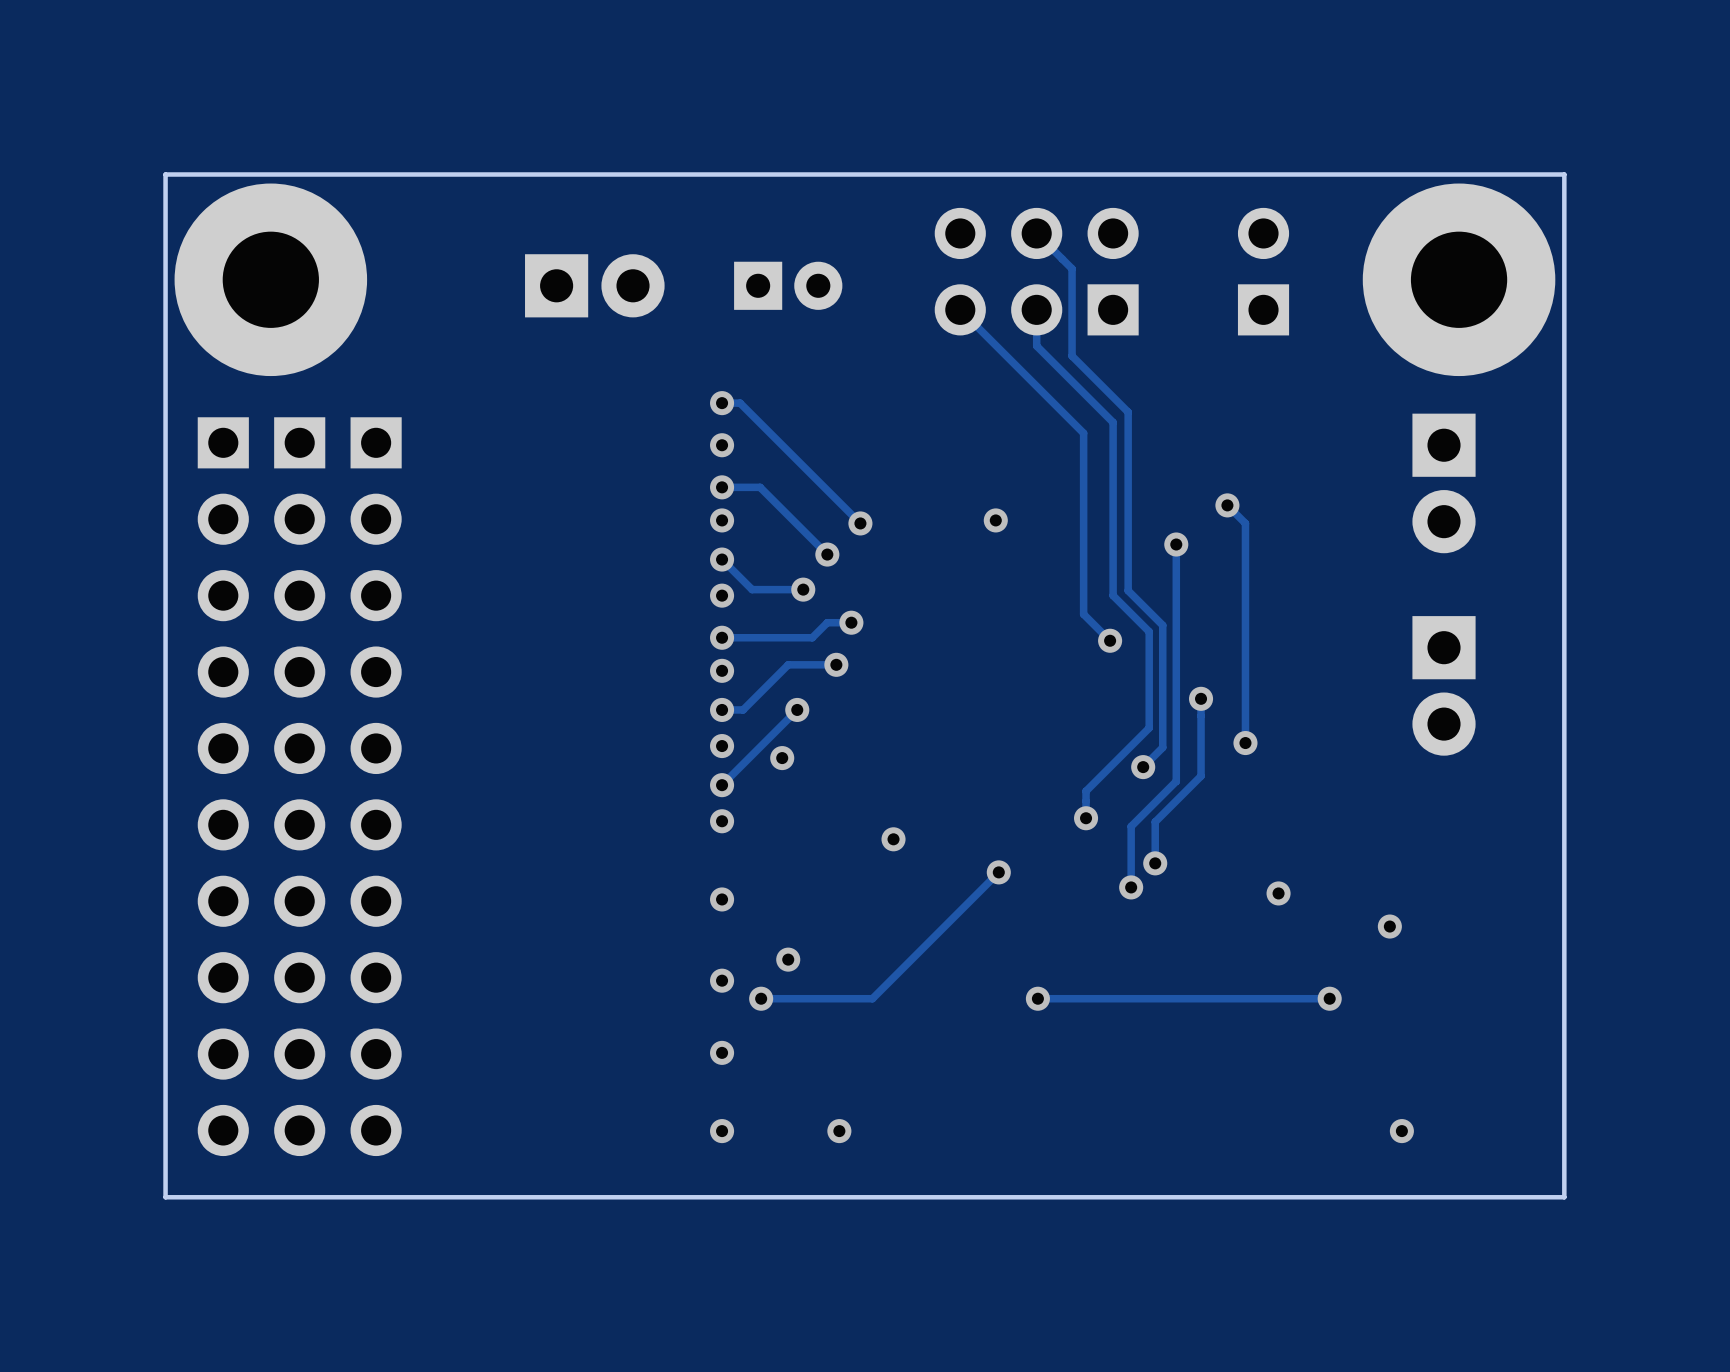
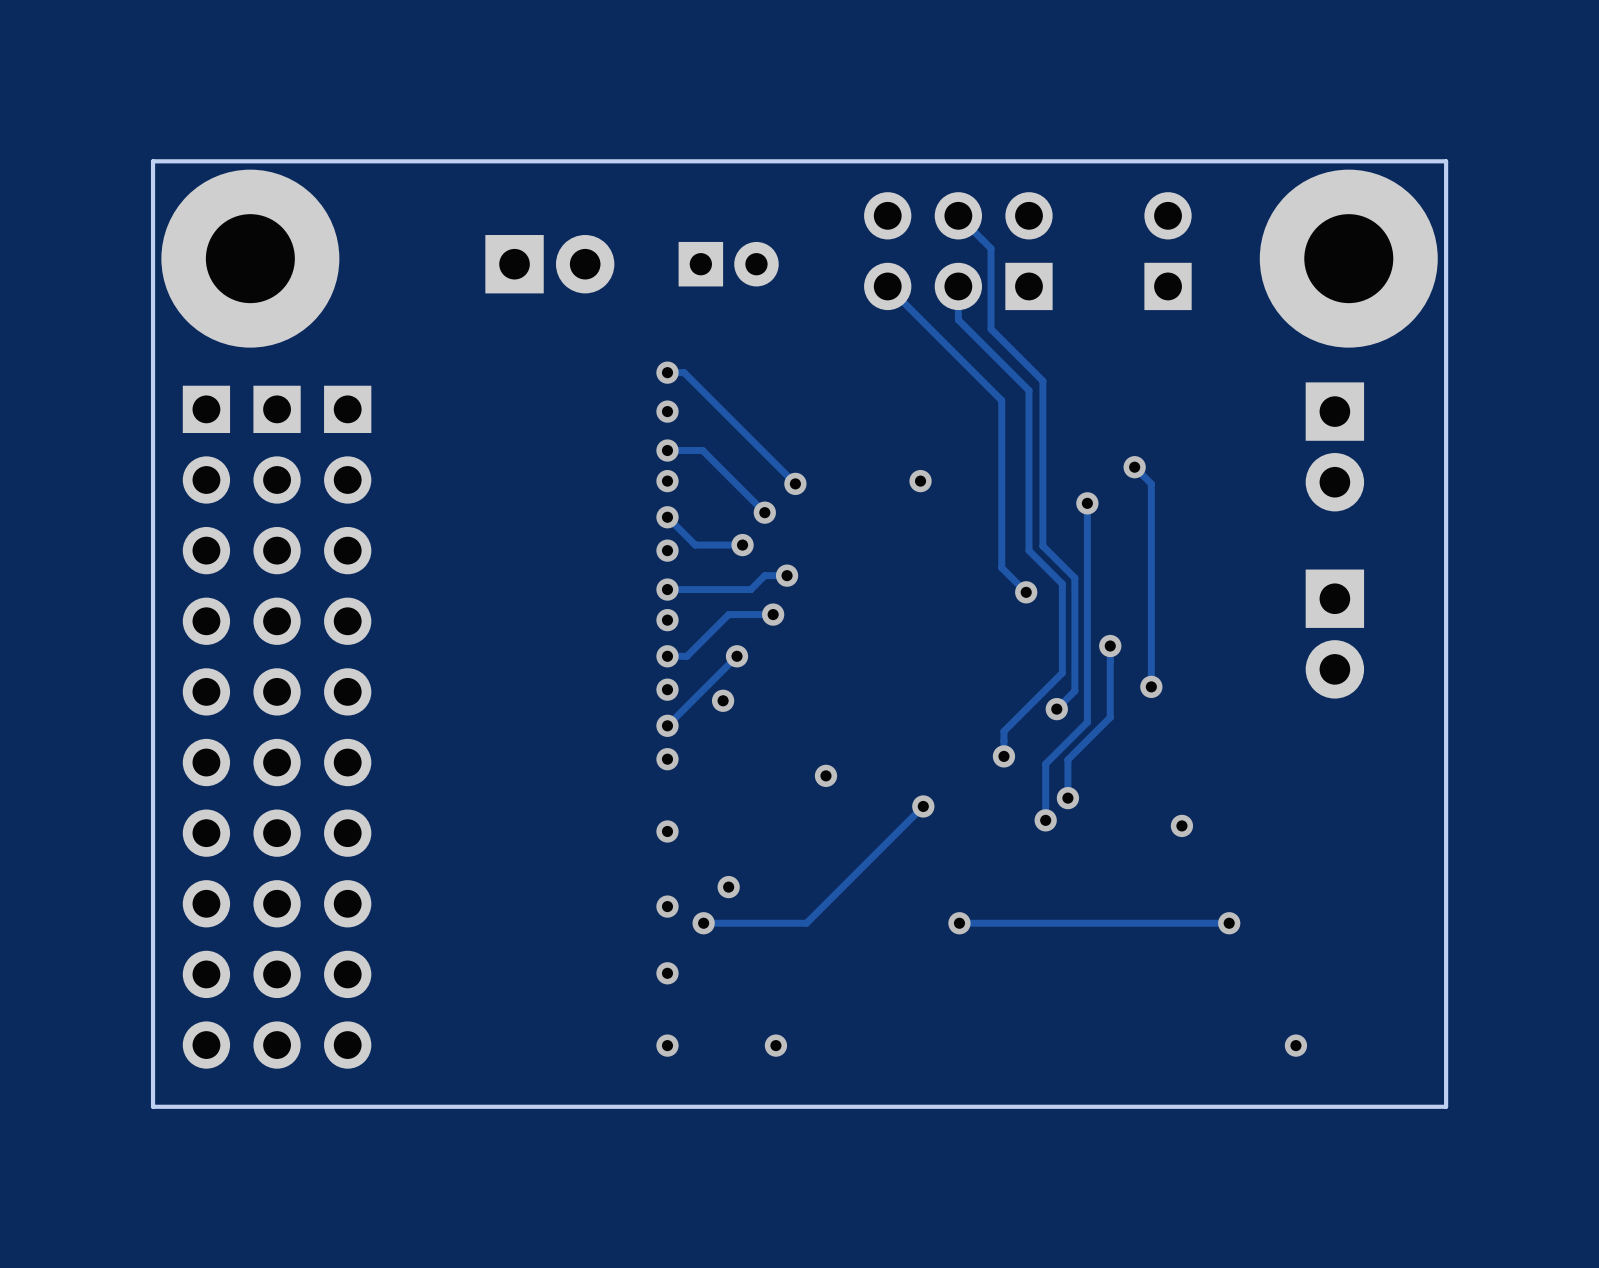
via: (1389, 926) -> none

